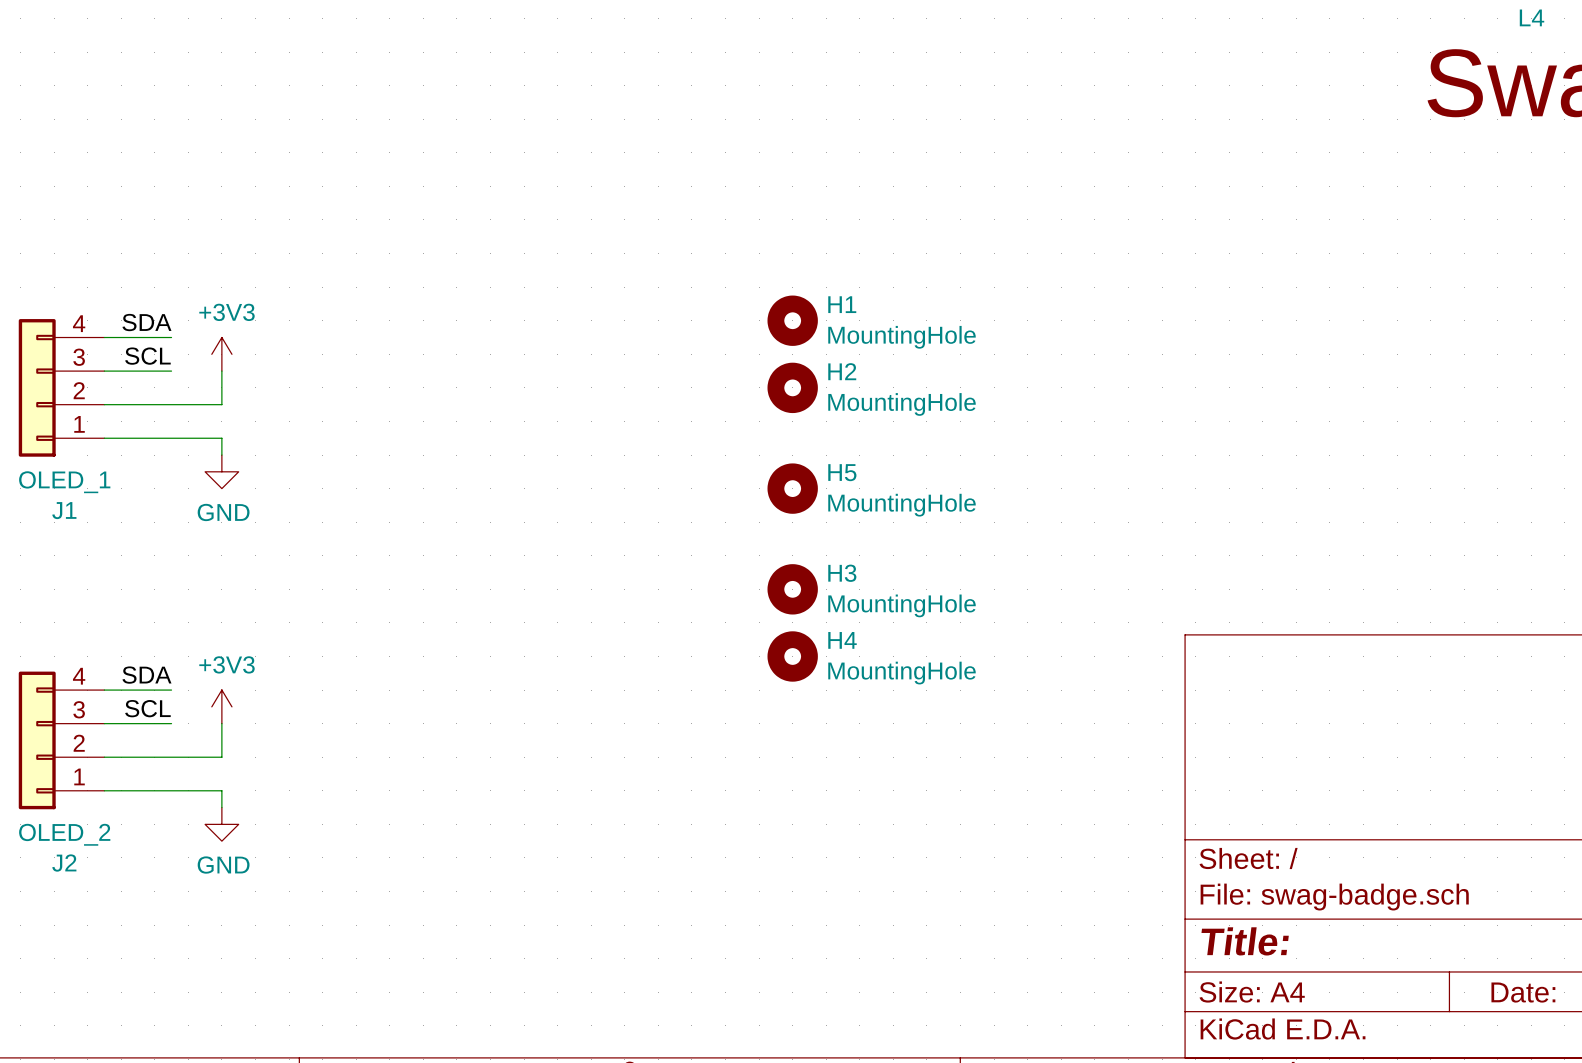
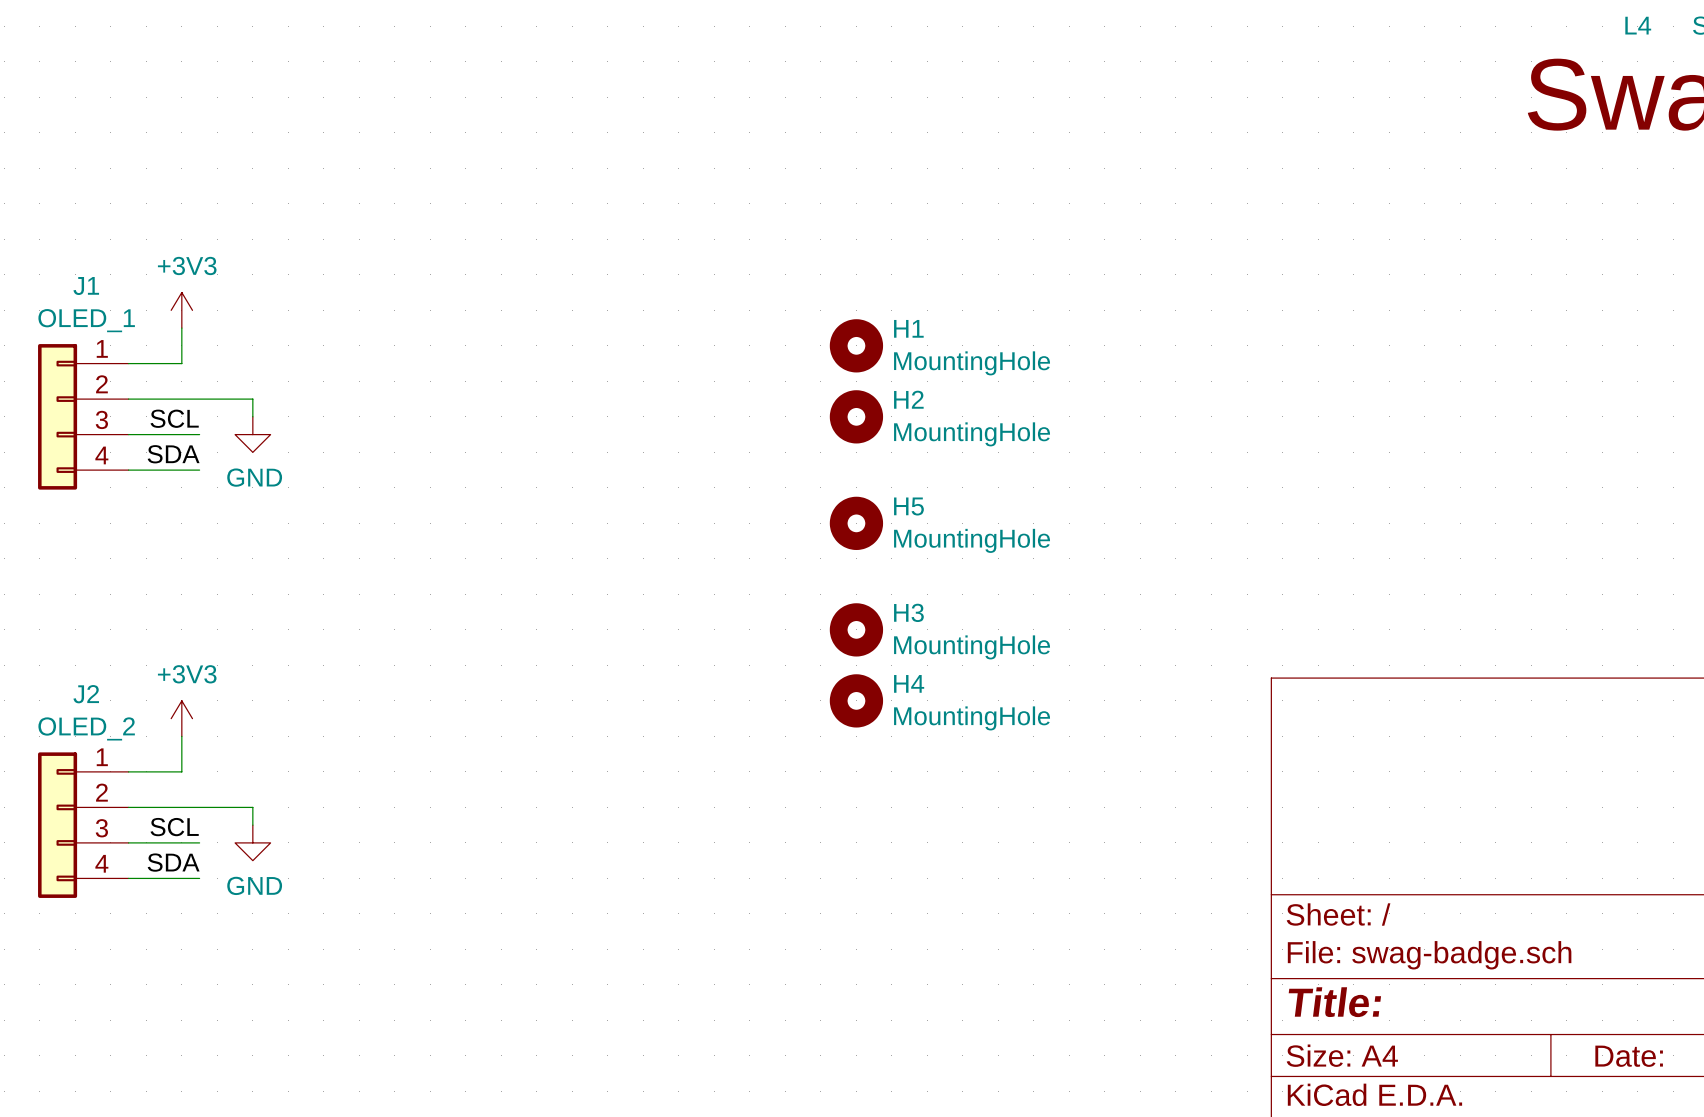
label position: SDA (146, 322) -> SDA (173, 454)
wire: (154, 337) (171, 337) -> (181, 363) (181, 328)
power symbol position: +3V3 (221, 354) -> +3V3 (181, 310)
label position: SCL (147, 356) -> SCL (174, 418)
wire: none -> (199, 399) (252, 399)
J1 flip: as is (37, 387) -> up-down (57, 416)
wire: (221, 387) (221, 404) (171, 404) -> none
wire: (171, 438) (221, 438) (221, 455) -> none
power symbol position: GND (221, 471) -> GND (252, 434)
label: SDA (146, 675) -> none
wire: (104, 690) (171, 690) -> (128, 878) (199, 878)
power symbol position: +3V3 (221, 706) -> +3V3 (181, 718)
label position: SCL (147, 708) -> SCL (174, 827)
wire: (154, 723) (171, 723) -> (181, 771) (181, 736)
wire: (221, 723) (221, 757) -> (252, 825) (252, 807)
J2 flip: as is (37, 740) -> up-down (57, 825)
wire: (171, 790) (221, 790) (221, 807) -> none
label: none -> SDA (173, 862)
power symbol position: GND (221, 824) -> GND (252, 842)

